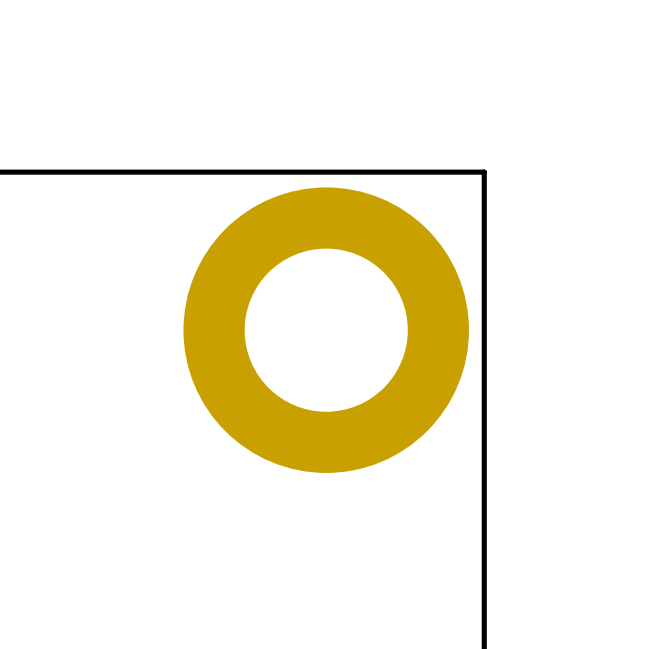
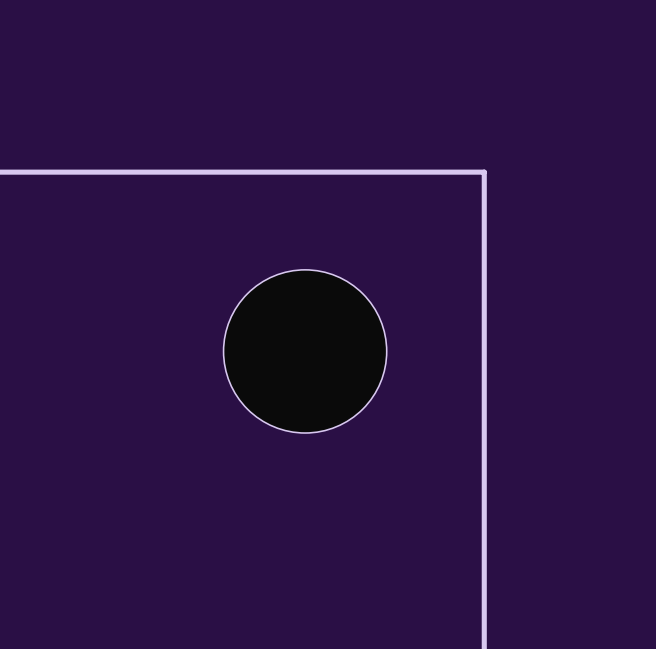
part footprint: [183, 187, 469, 473] -> [223, 269, 387, 434]

